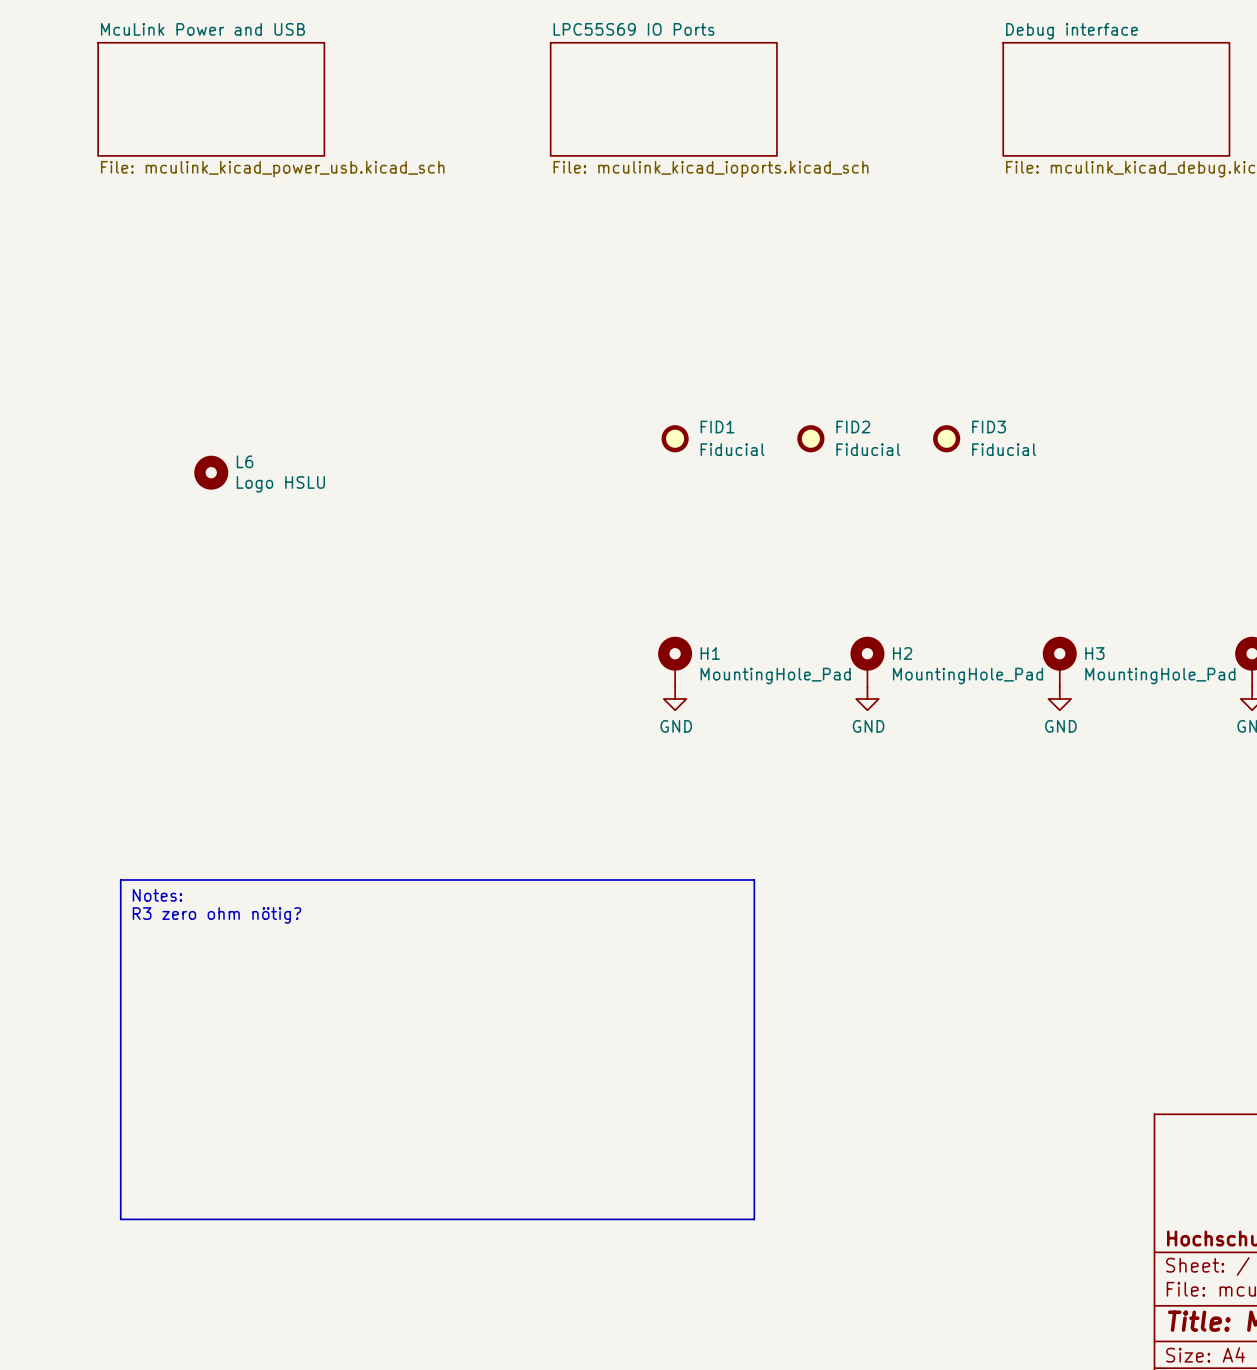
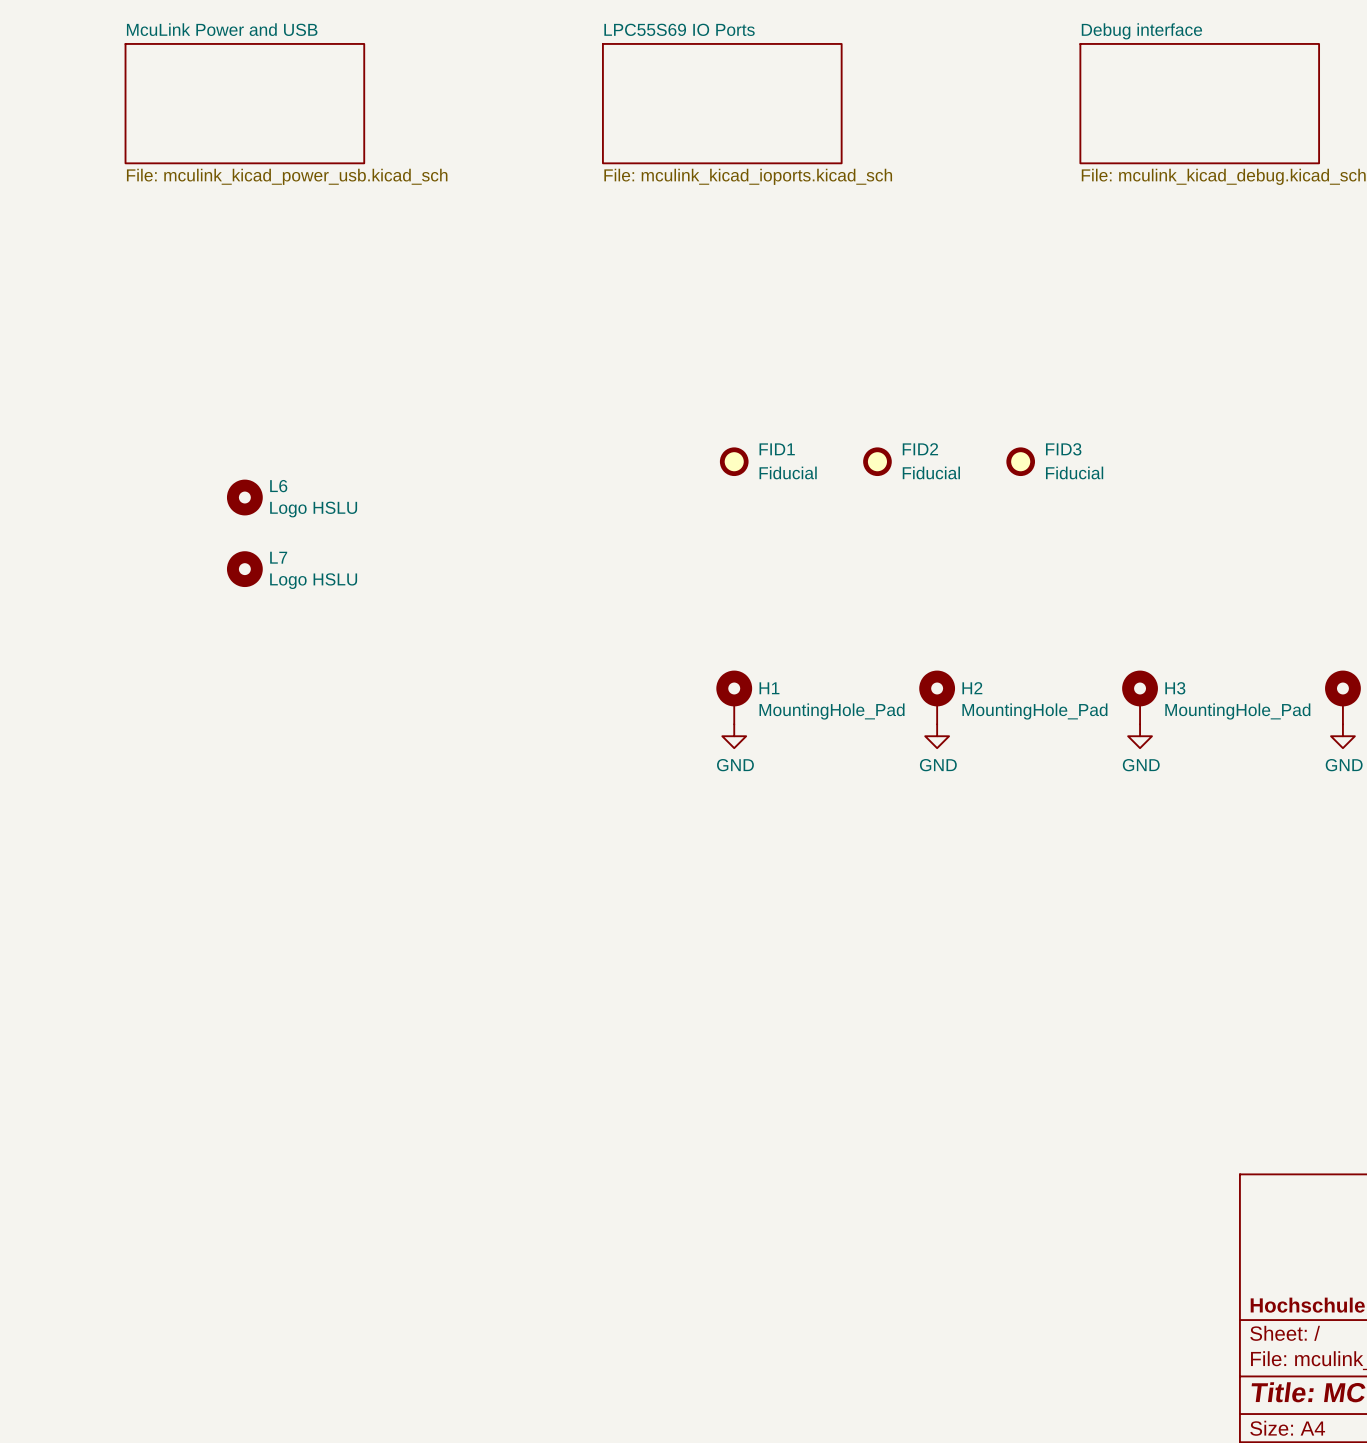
L7: none -> Logo HSLU (244, 569)
line: (120, 879) (754, 879) (754, 1219) (120, 1219) (120, 879) -> none
text: Notes: (157, 895) -> none
text: R3 zero ohm nötig? (217, 915) -> none

